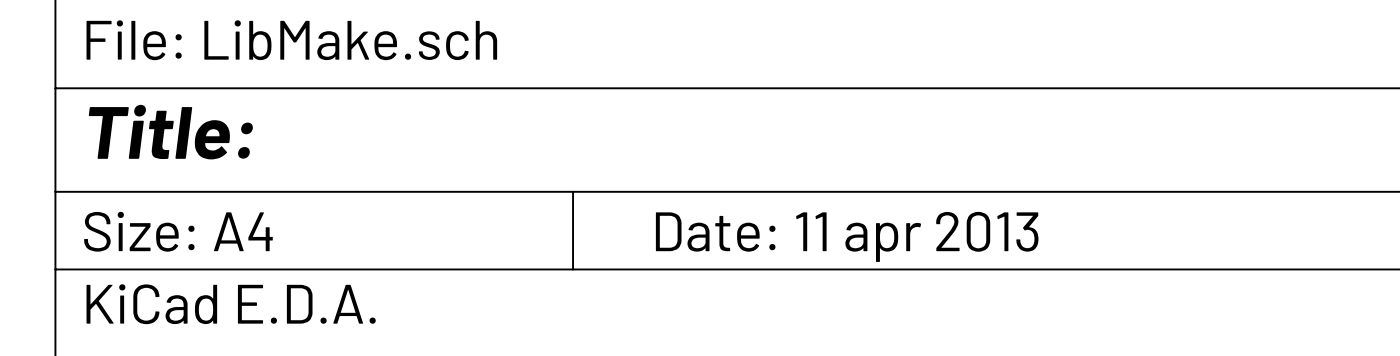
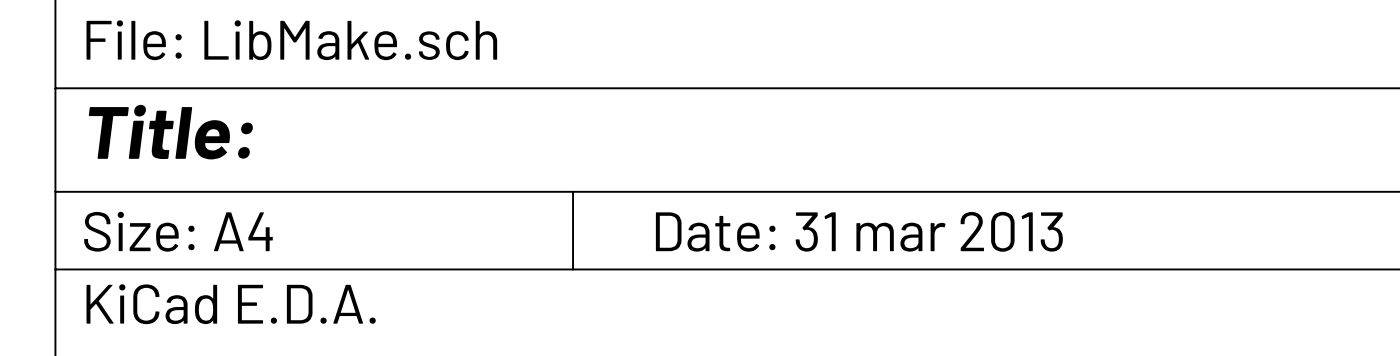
title block: Date: 11 apr 2013 (847, 236) -> Date: 31 mar 2013 (859, 231)

